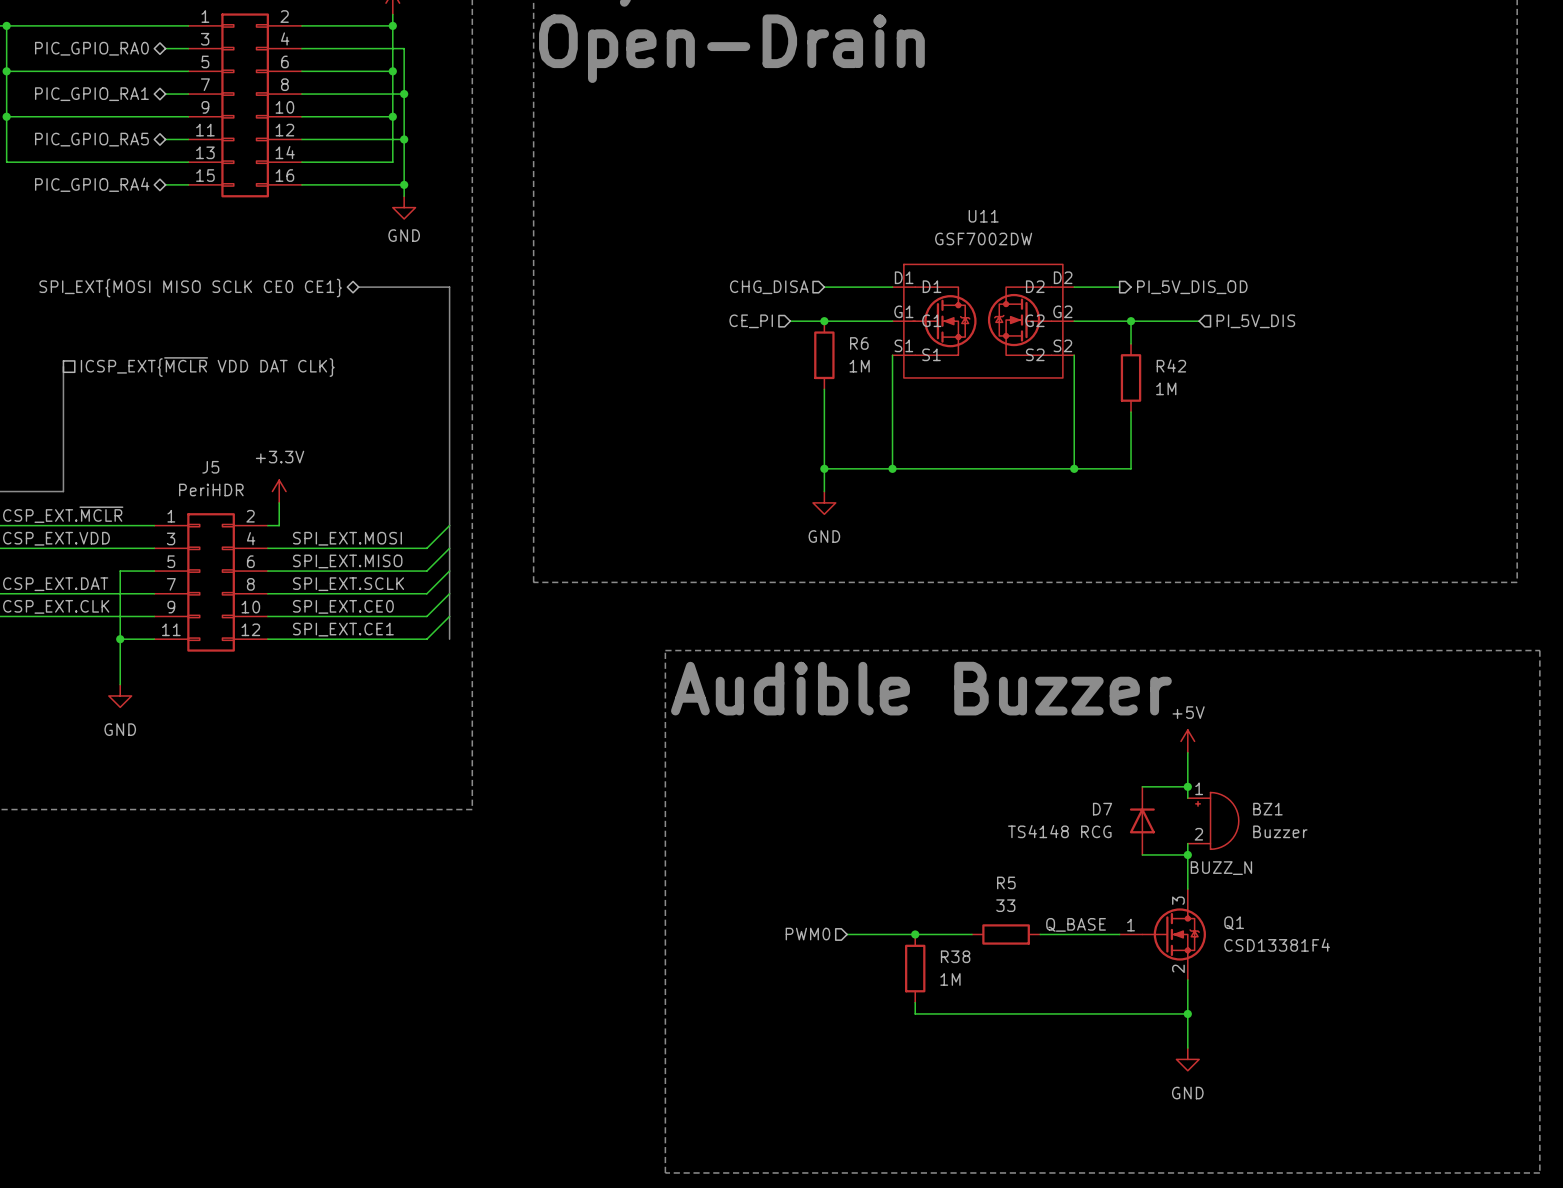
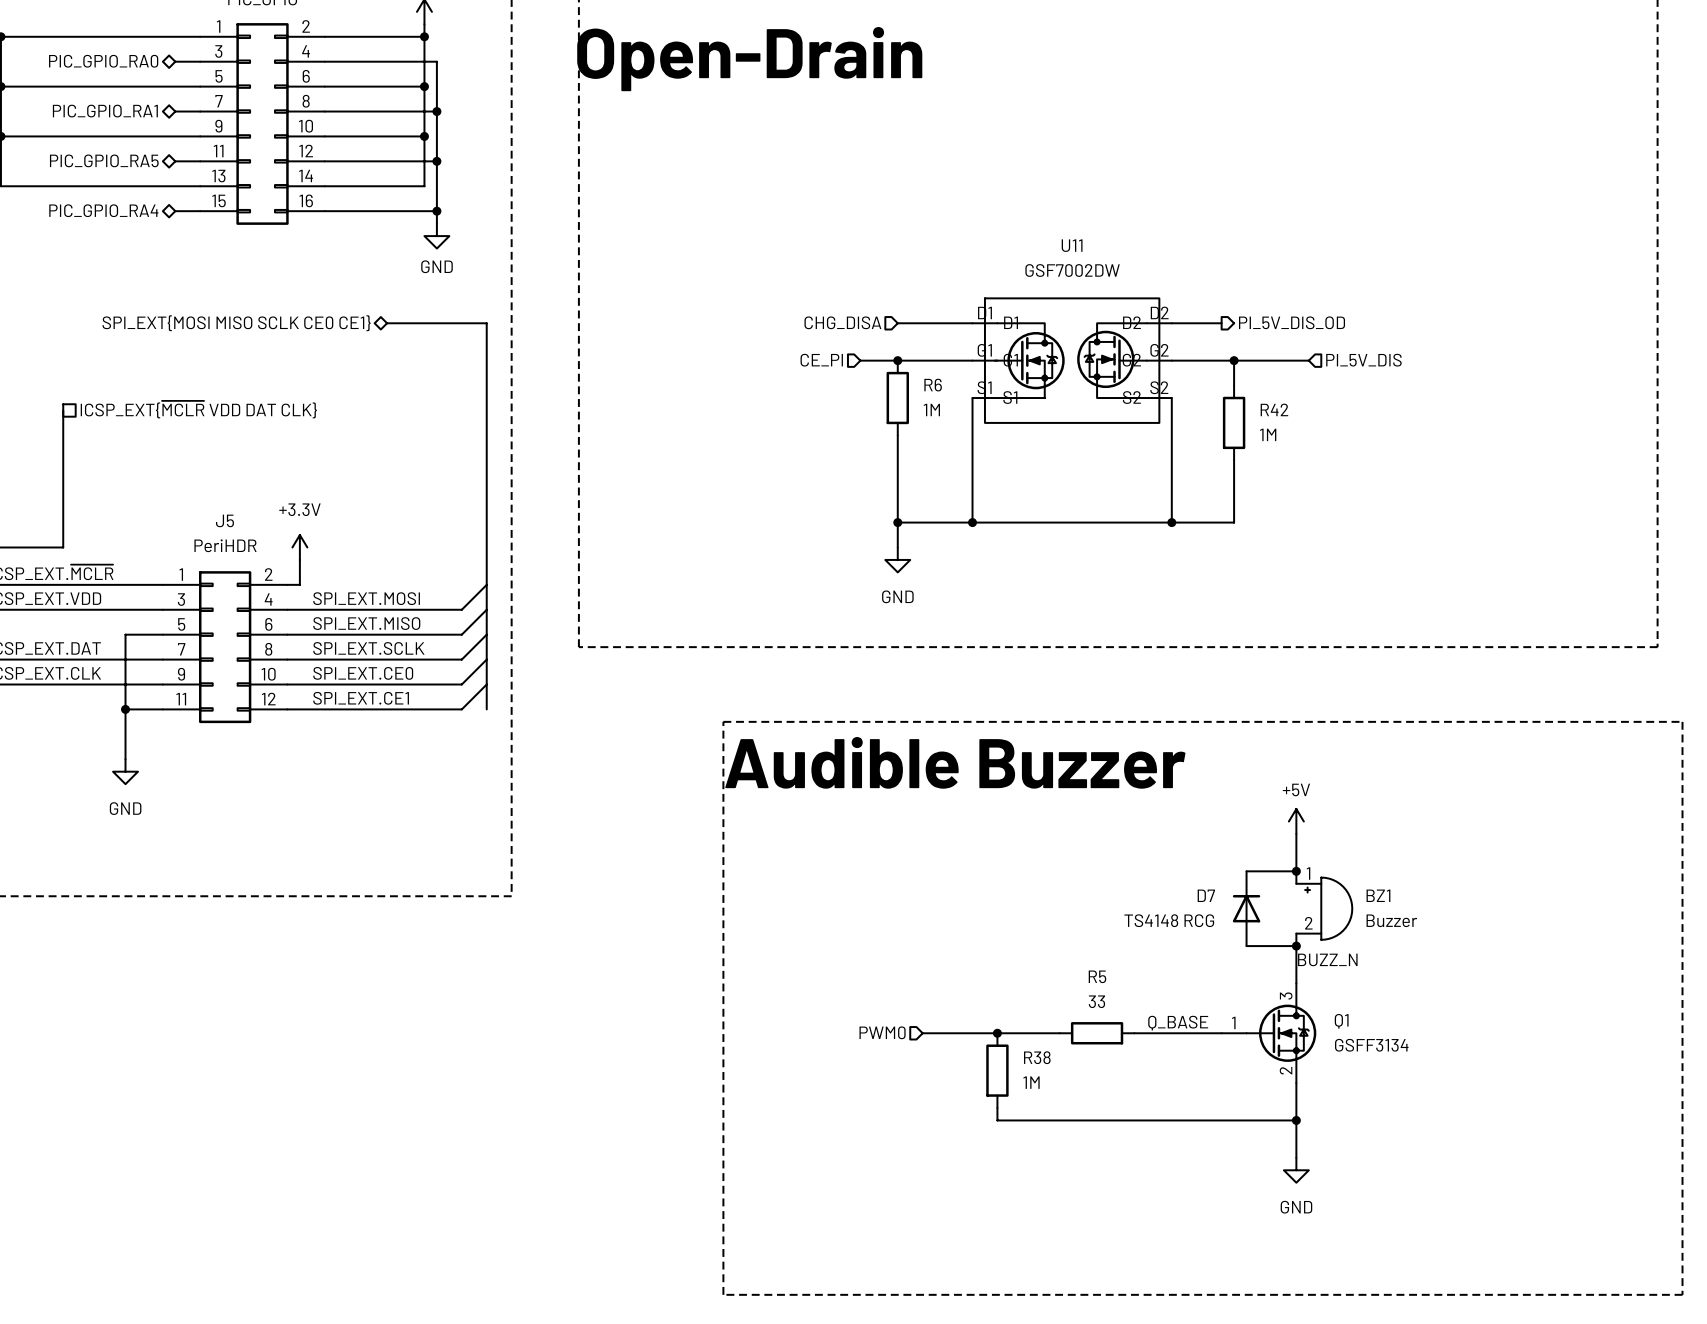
Q1 value: CSD13381F4 (1277, 945) -> GSFF3134 (1371, 1045)

